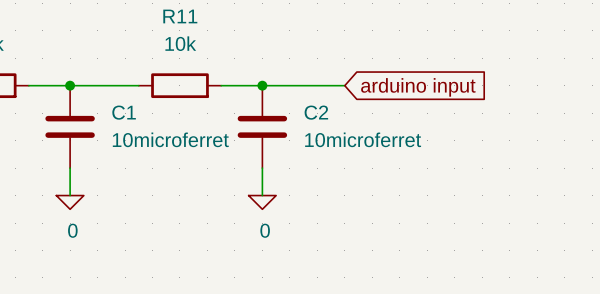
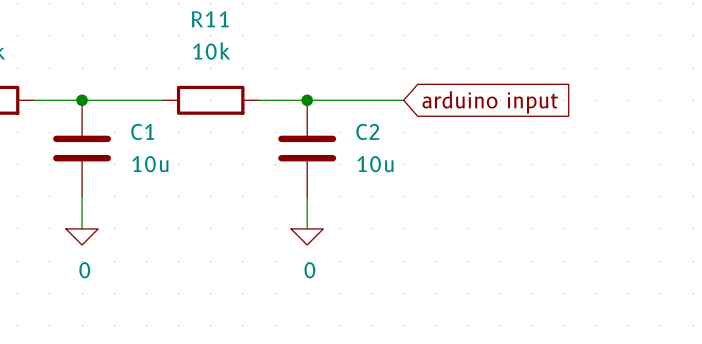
C1 value: 10microferret (170, 139) -> 10u (150, 164)
C2 value: 10microferret (363, 139) -> 10u (375, 164)

